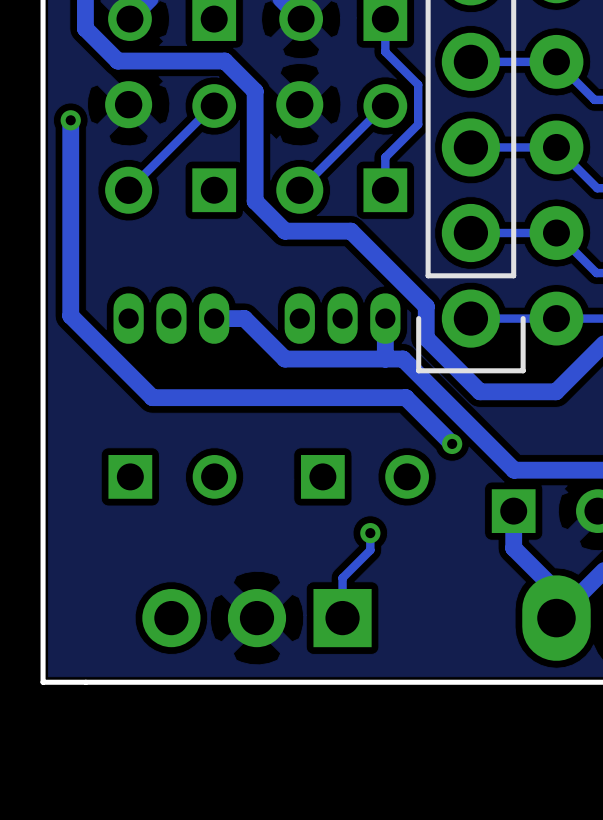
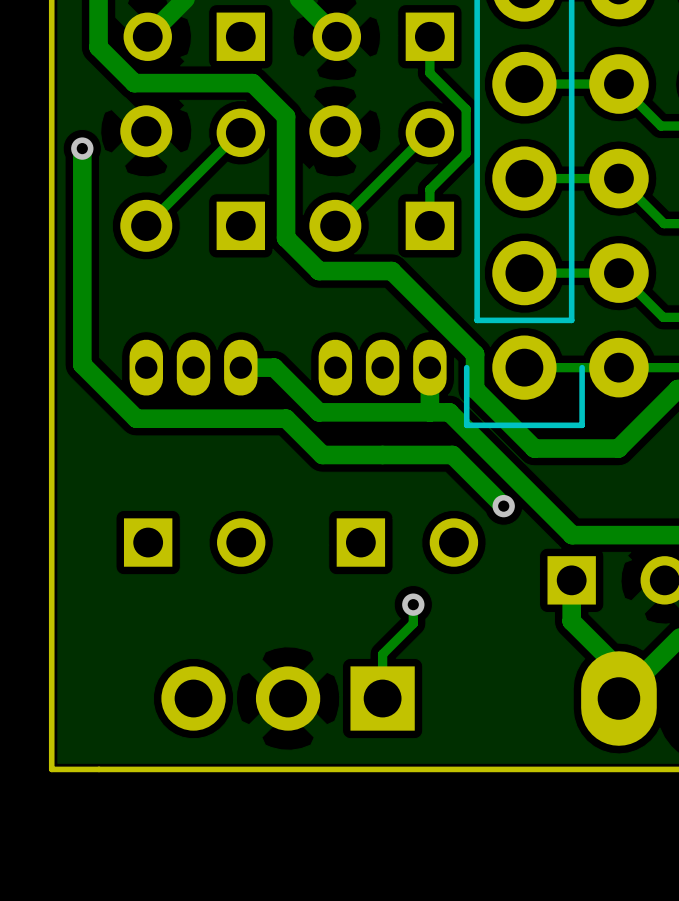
track: (119, 364) (152, 397) (288, 397) -> (136, 418) (286, 418) (322, 454)

